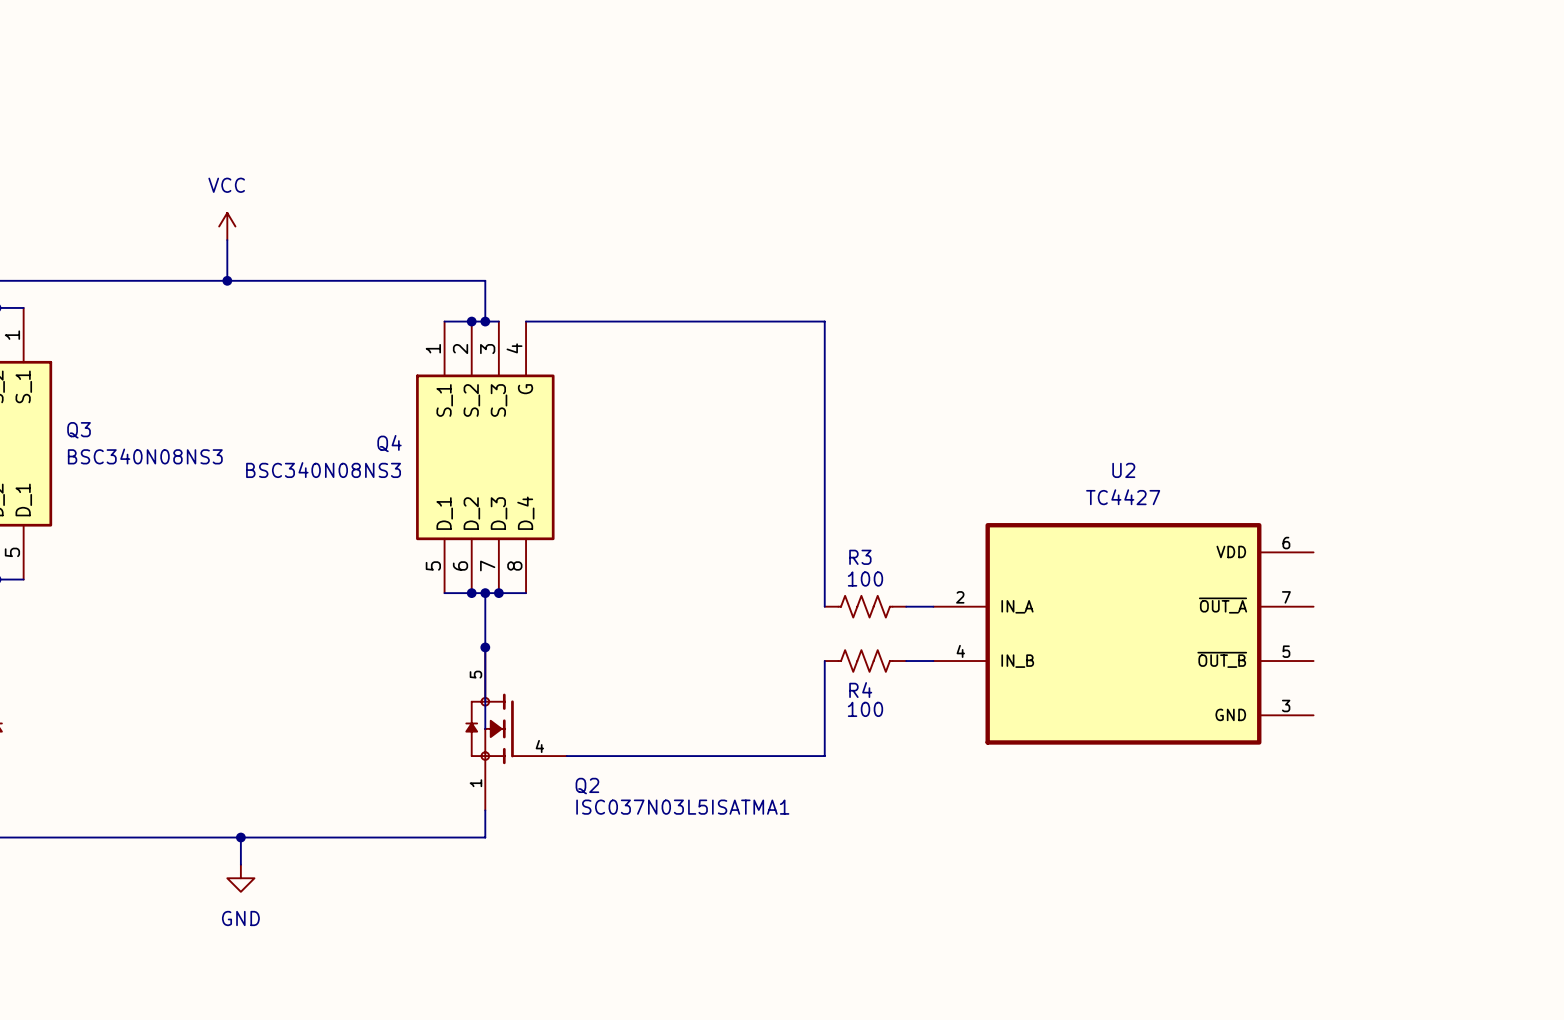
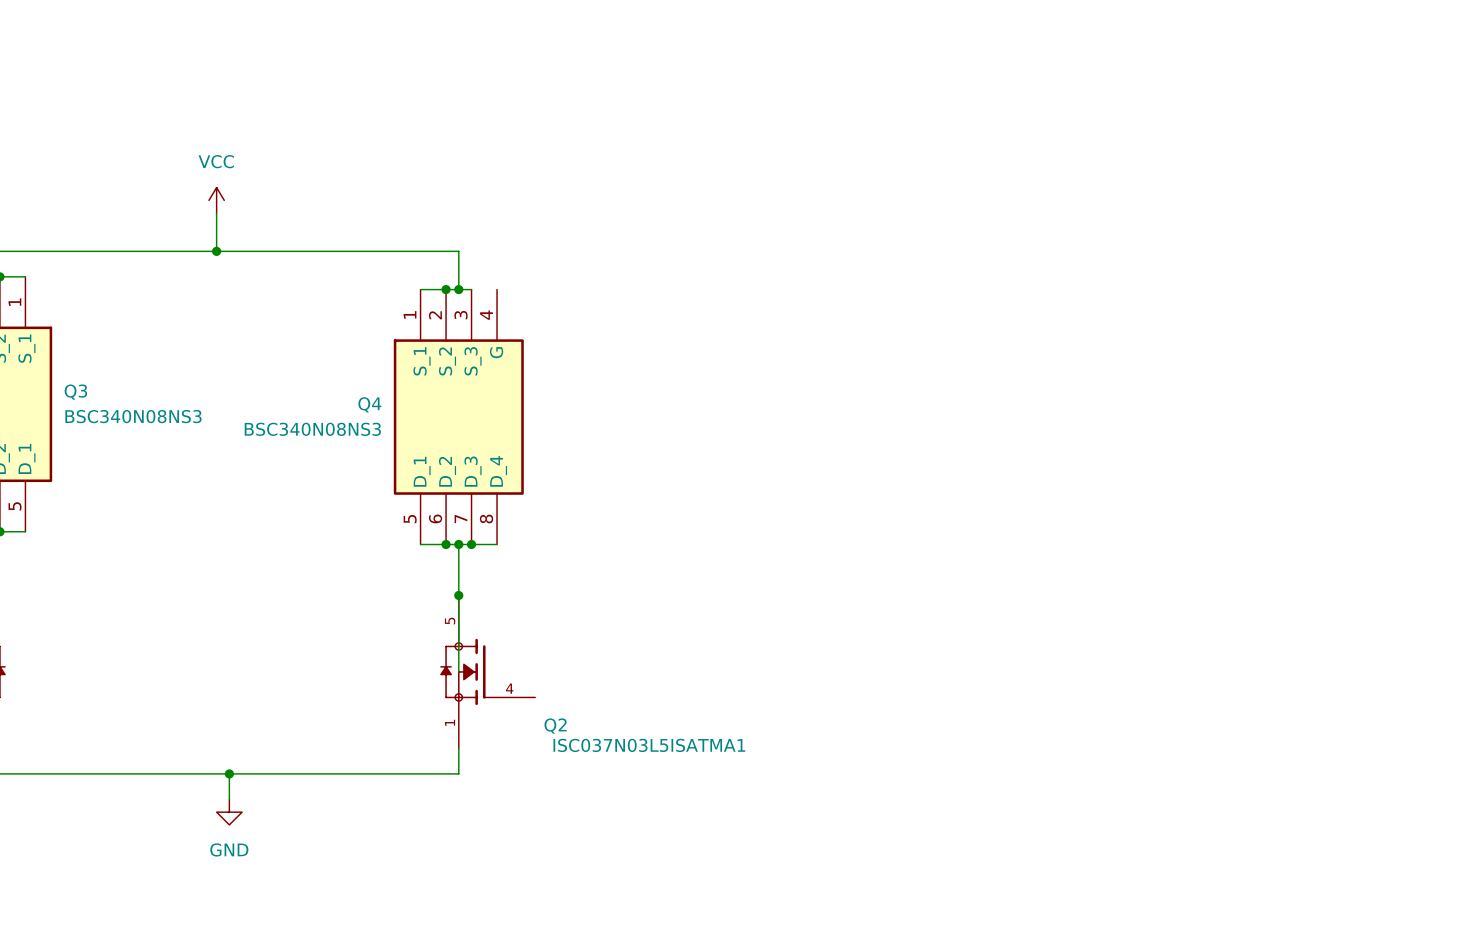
wire: (526, 321) (824, 321) (824, 606) -> none
R3: 100 (865, 606) -> none
wire: (906, 606) (933, 606) -> none
U2: TC4427 (1123, 633) -> none
wire: (824, 661) (824, 756) (566, 756) -> none
R4: 100 (865, 661) -> none
wire: (906, 661) (933, 661) -> none

